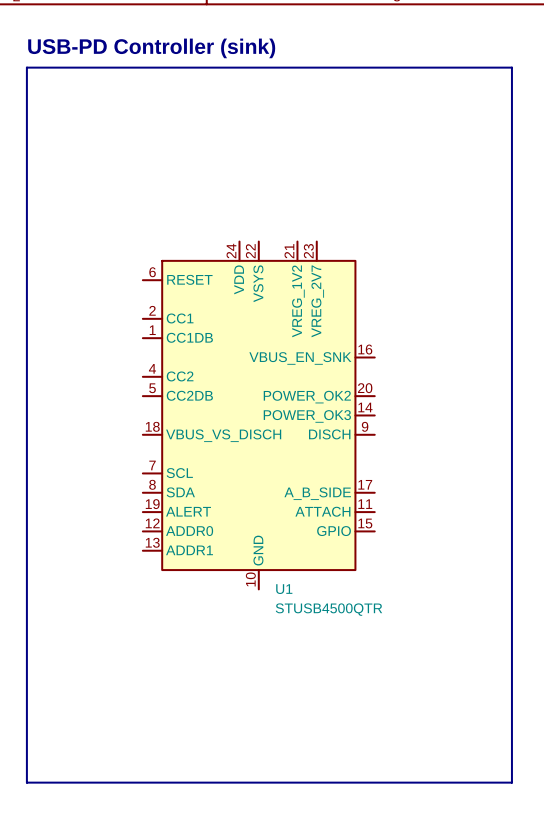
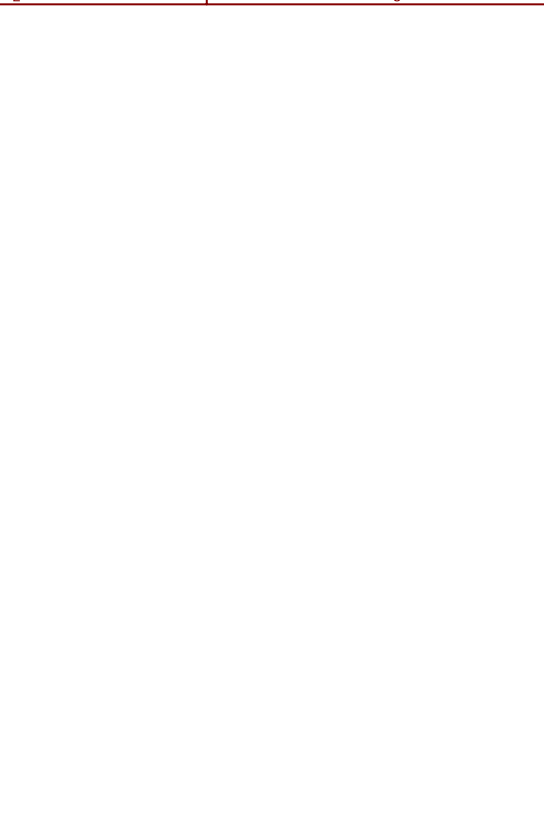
text: USB-PD Controller (sink) (151, 48) -> none
line: (26, 67) (511, 67) (511, 782) (26, 782) (26, 67) -> none
U1: STUSB4500QTR (258, 415) -> none

